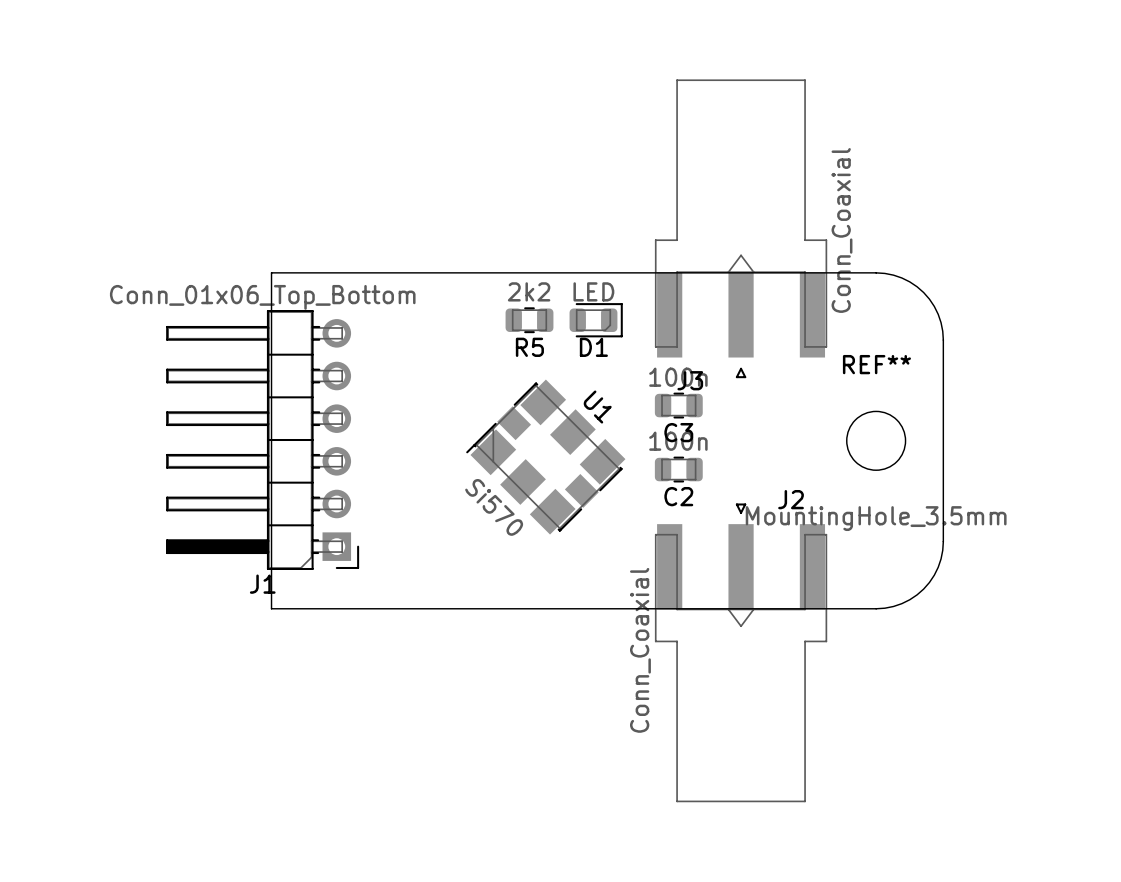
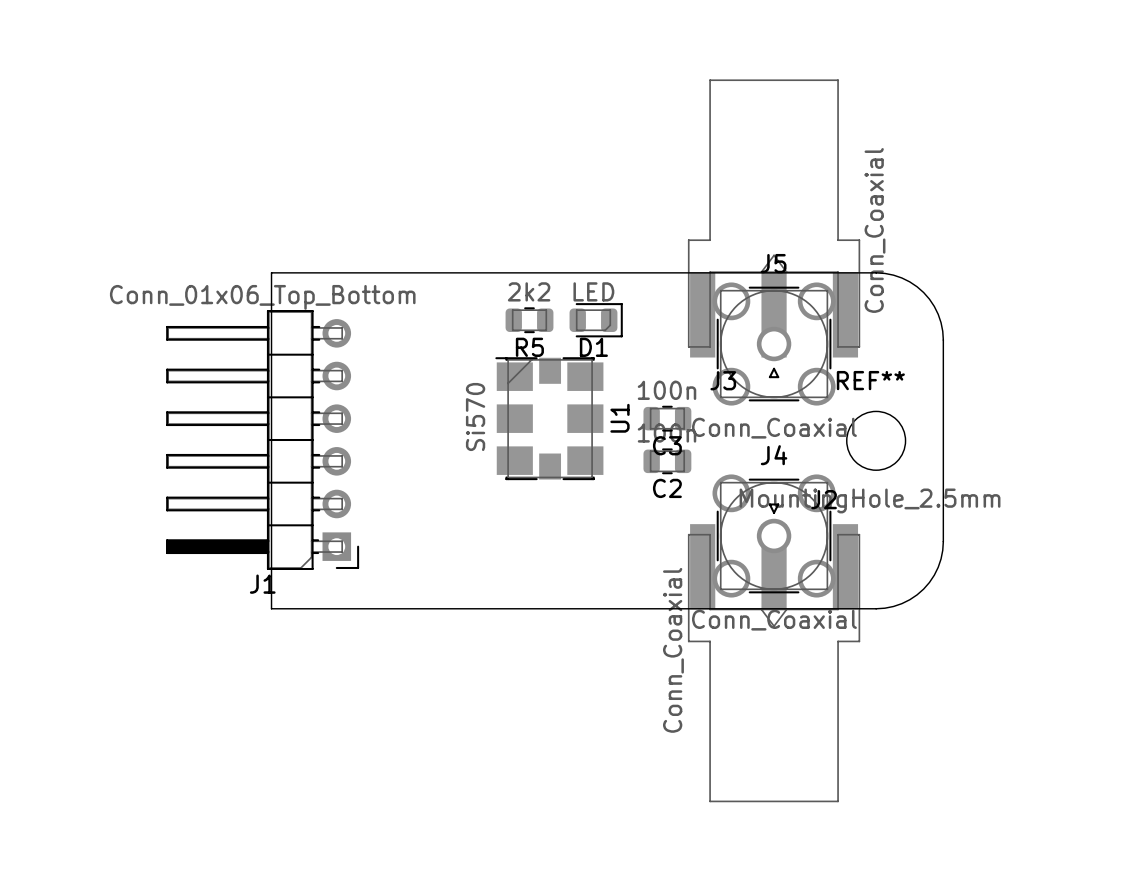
J3 position: (741, 228) -> (774, 228)
J5: none -> Conn_Coaxial (774, 344)
REF** name position: REF** (876, 364) -> REF** (870, 380)
C3 position: (678, 405) -> (667, 418)
U1 rotation: 0° (545, 457) -> 45° clockwise (549, 418)
C2 position: (678, 469) -> (667, 461)
REF** value: MountingHole_3.5mm (876, 518) -> MountingHole_2.5mm (870, 500)
J4: none -> Conn_Coaxial (774, 535)
J2 position: (741, 652) -> (774, 652)

